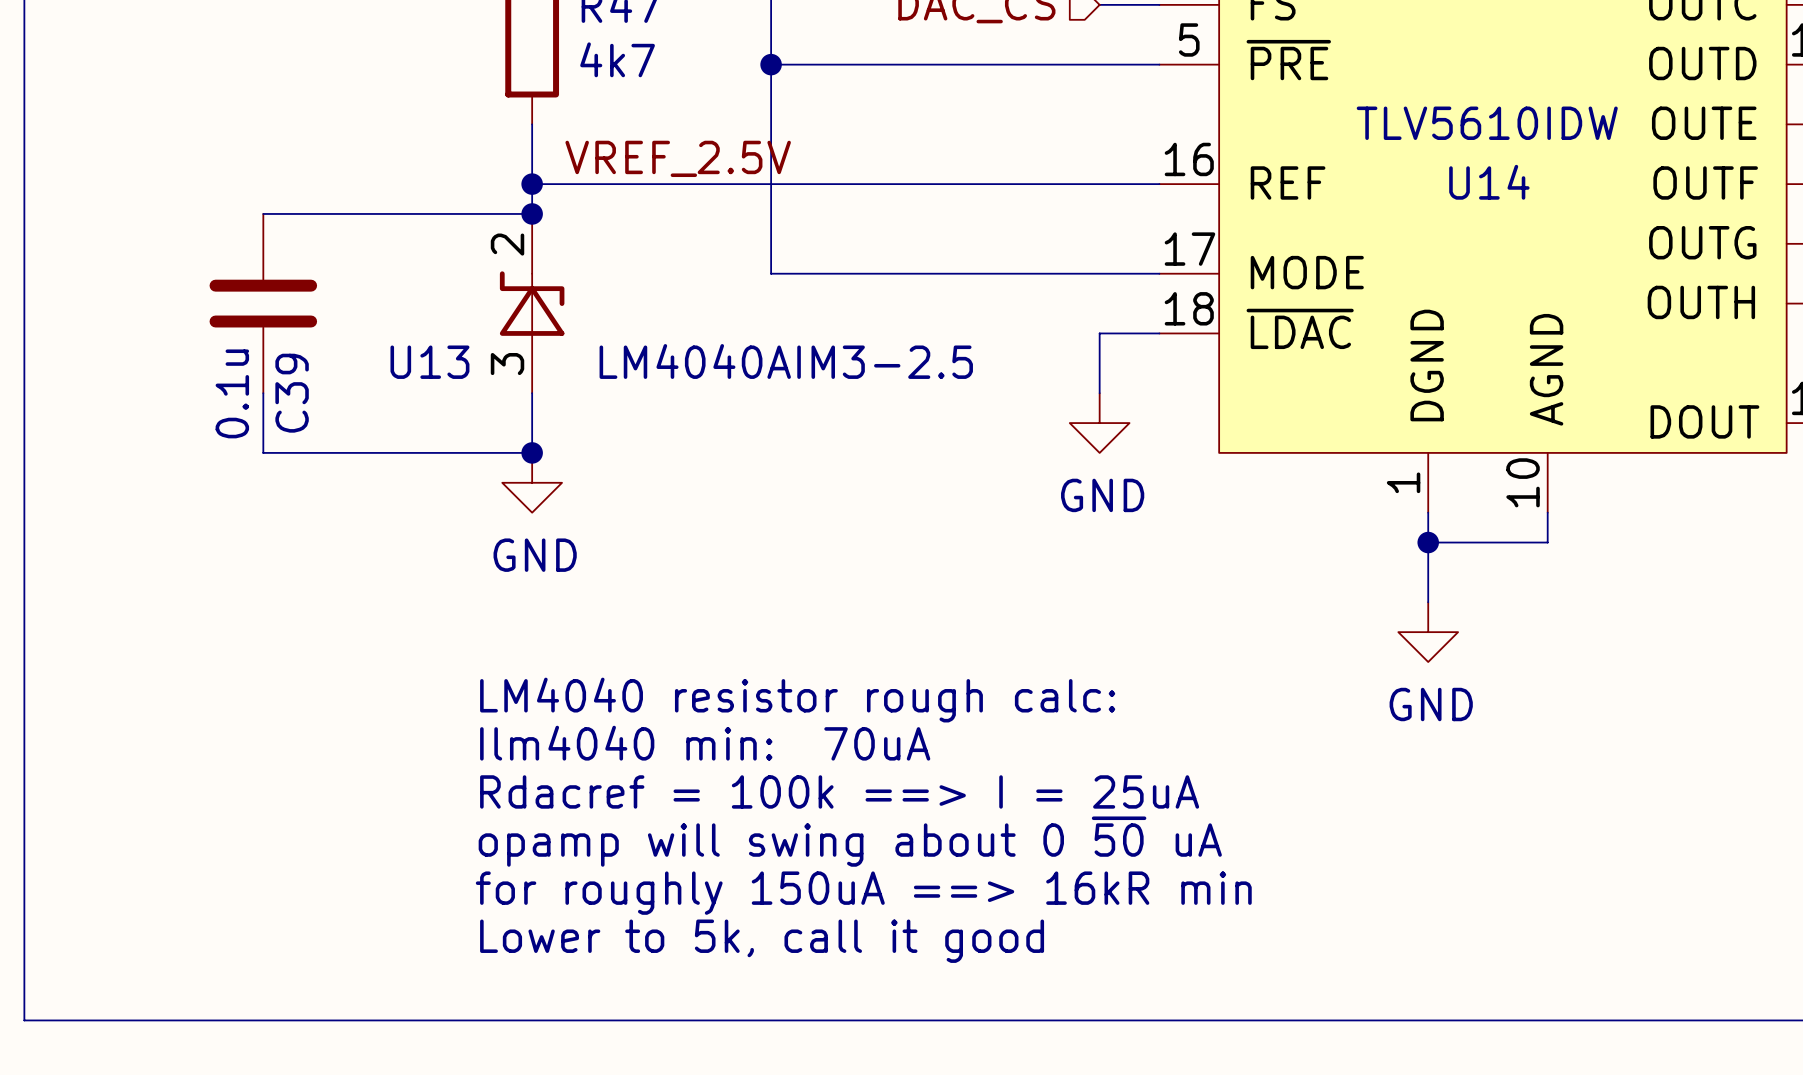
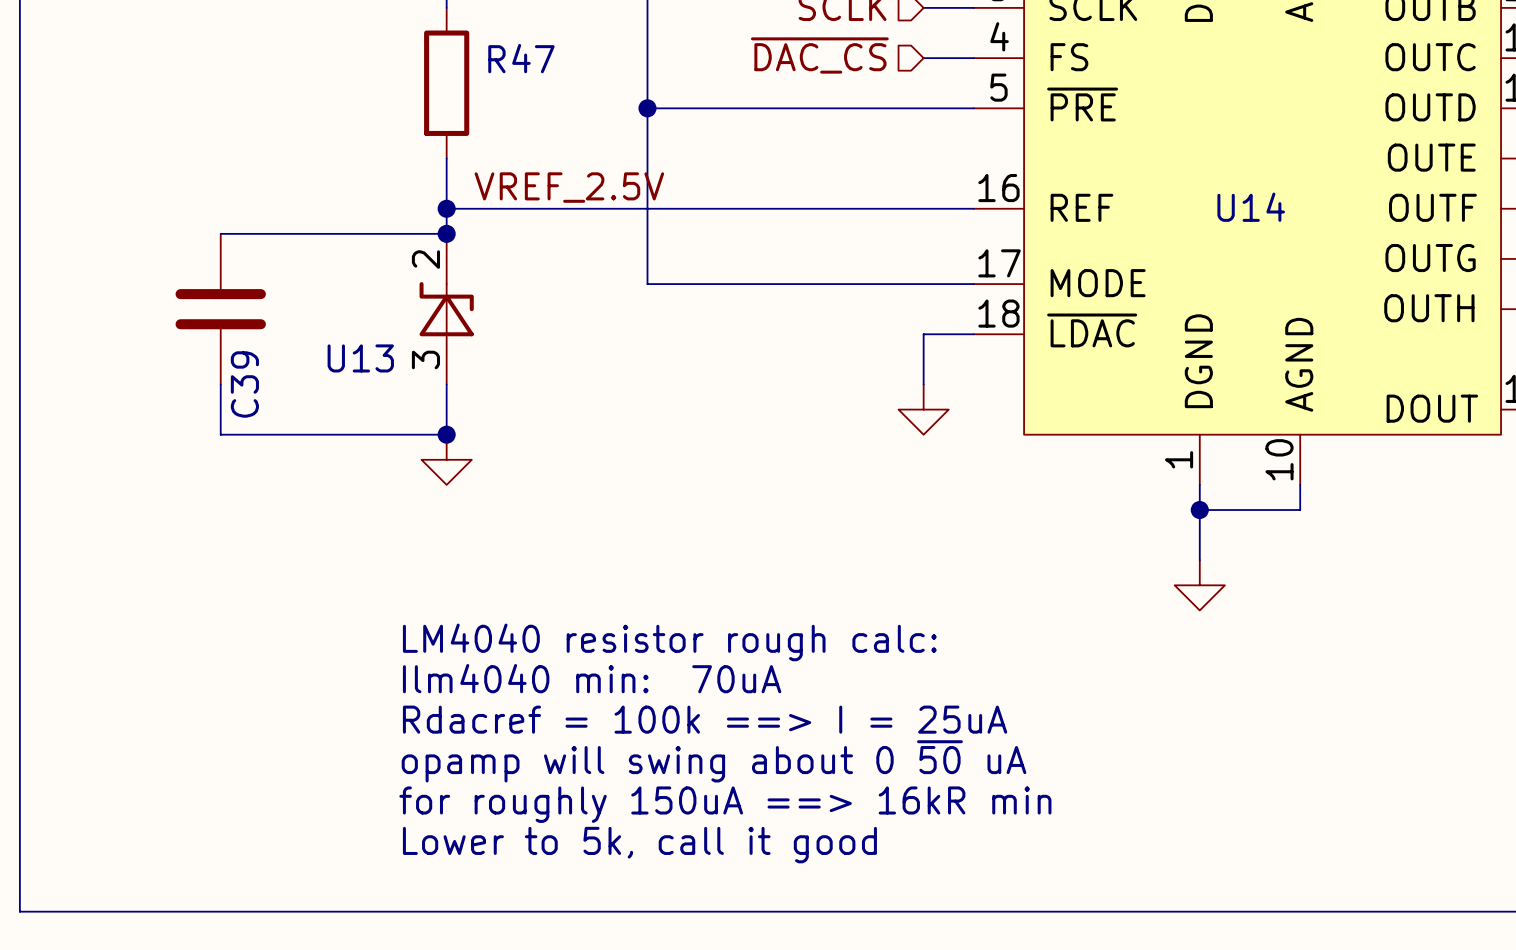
R47 value: 4k7 (617, 59) -> none
U14 value: TLV5610IDW (1487, 123) -> none
U13 value: LM4040AIM3-2.5 (786, 361) -> none
C39 value: 0.1u (232, 393) -> none
power symbol text: GND (1102, 495) -> none
power symbol text: GND (535, 555) -> none
power symbol text: GND (1431, 704) -> none

